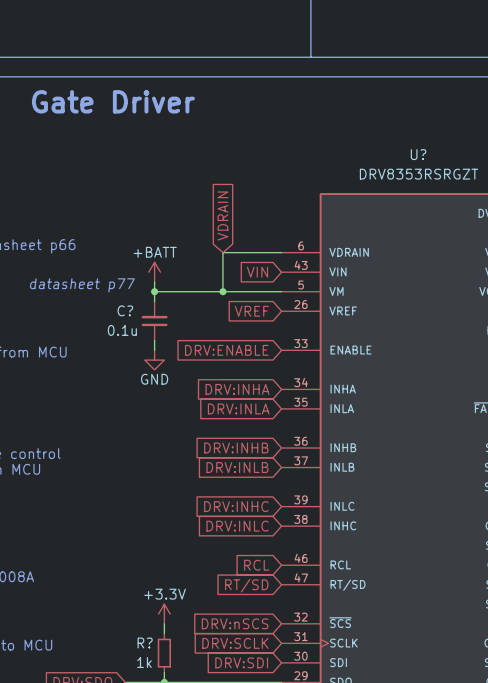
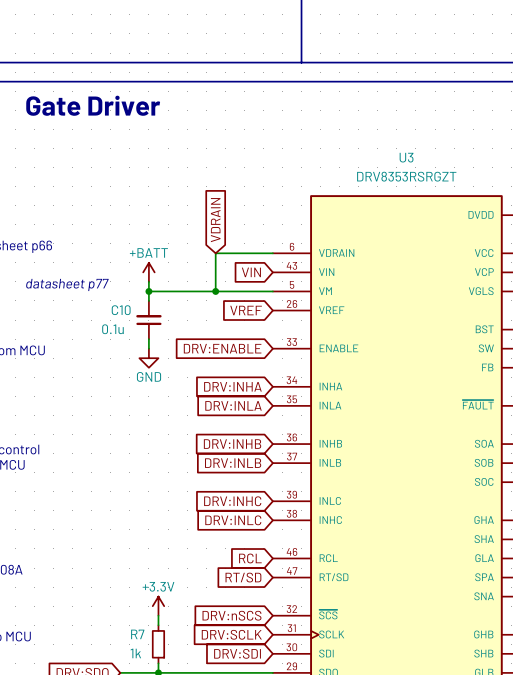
U? name: U? (418, 154) -> U3 (406, 157)
C? name: C? (125, 310) -> C10 (121, 310)
R? name: R? (145, 643) -> R7 (137, 634)

